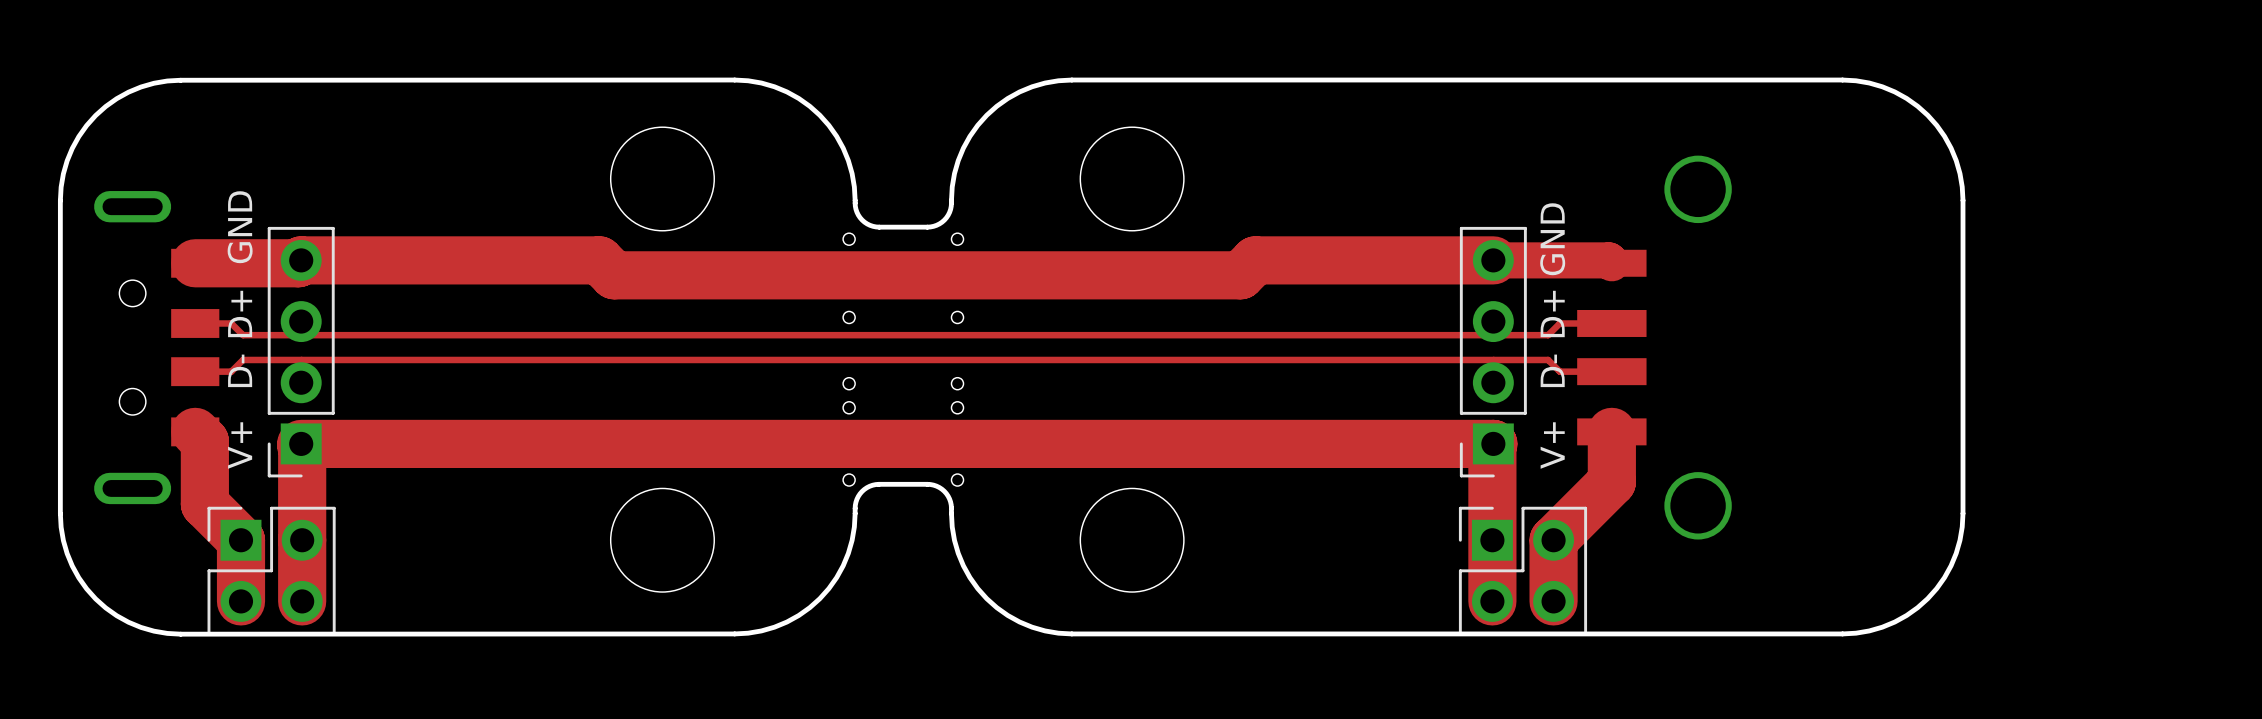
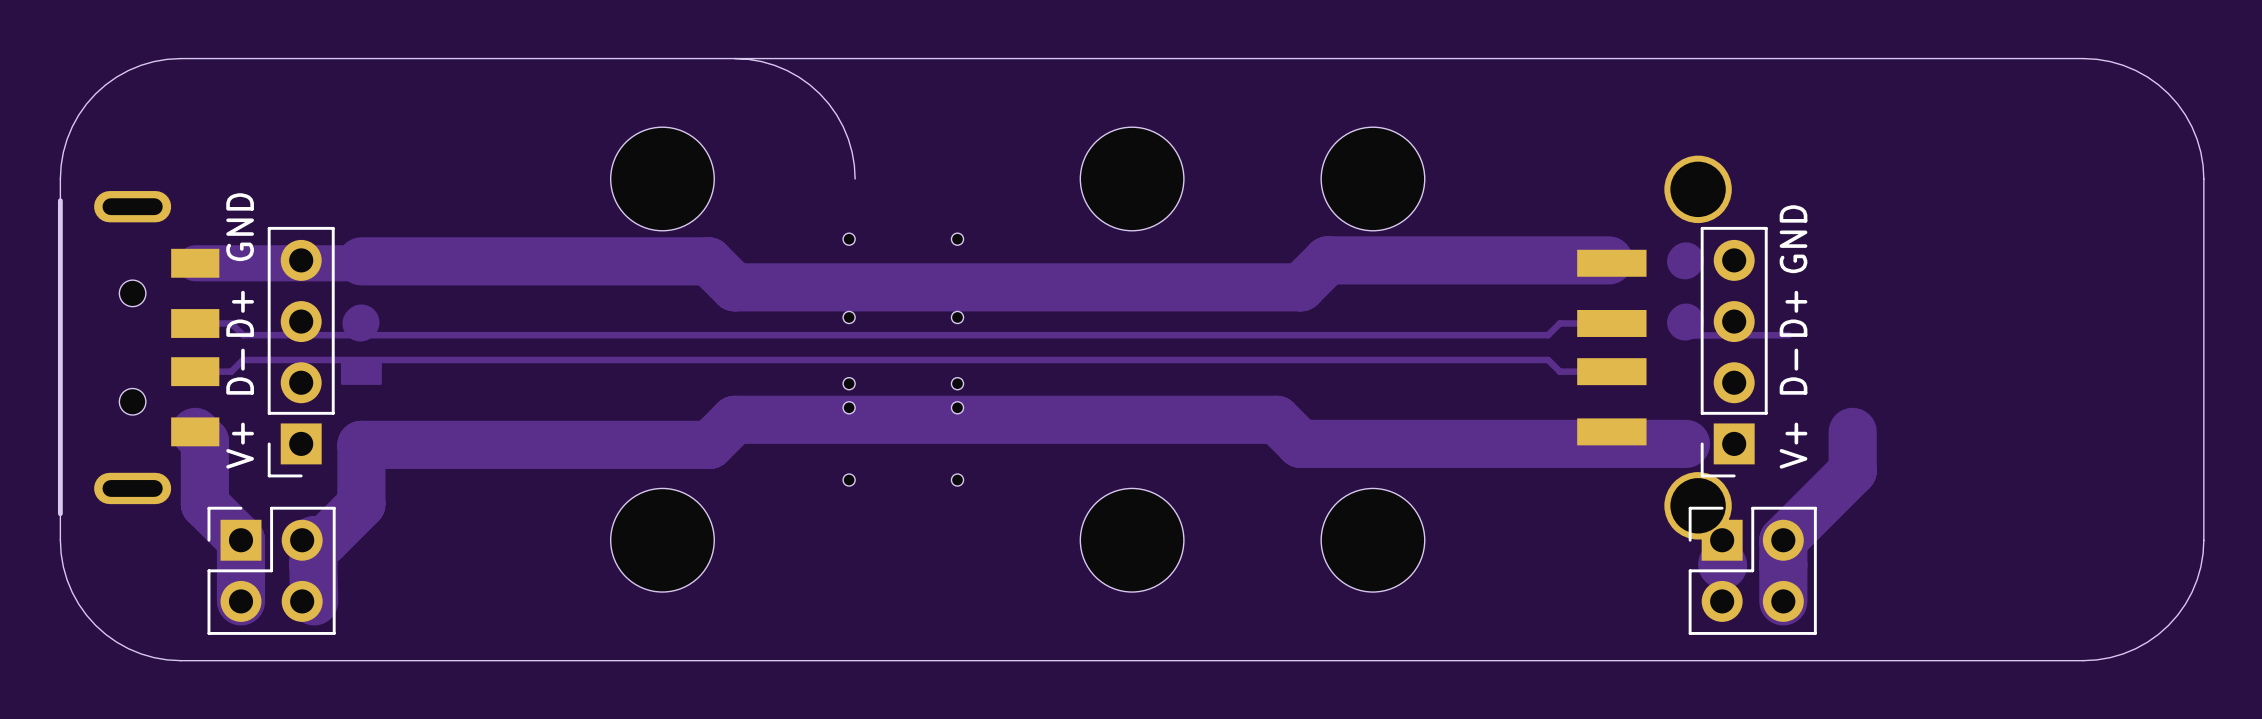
board edge: none -> (734, 58) (748, 59) (774, 65) (798, 77) (819, 93) (836, 114) (848, 139) (854, 165) (855, 178)
part: none -> (1372, 178)
board edge: (60, 200) (61, 187) (67, 160) (78, 136) (86, 125) (95, 115) (116, 98) (141, 87) (153, 83) (180, 80) (734, 80) (761, 83) (786, 91) (809, 106) (819, 115) (836, 136) (848, 160) (858, 215) (864, 222) (876, 226) (930, 226) (942, 222) (950, 209) (954, 173) (963, 148) (969, 136) (986, 115) (1007, 98) (1032, 86) (1058, 80) (1071, 80) (1856, 80) (1882, 86) (1894, 91) (1906, 98) (1927, 115) (1944, 136) (1956, 160) (1962, 186) (1963, 200) (1963, 513) (1959, 540) (1951, 565) (1944, 577) (1927, 598) (1906, 615) (1894, 622) (1882, 627) (1856, 633) (1058, 633) (1032, 627) (1007, 615) (986, 598) (977, 588) (969, 577) (958, 553) (952, 527) (950, 501) (941, 489) (930, 484) (878, 484) (864, 489) (856, 499) (854, 527) (848, 553) (836, 577) (828, 588) (819, 598) (798, 615) (774, 627) (761, 630) (734, 633) (167, 633) (141, 627) (128, 622) (116, 615) (95, 598) (78, 577) (67, 553) (61, 527) (60, 513) -> (60, 200) (63, 152) (72, 126) (86, 103) (95, 93) (116, 77) (141, 65) (167, 59) (2096, 59) (2123, 65) (2135, 70) (2147, 77) (2168, 93) (2185, 114) (2191, 126) (2200, 152) (2203, 178) (2203, 540) (2203, 553) (2197, 580) (2185, 604) (2168, 625) (2147, 642) (2135, 648) (2123, 653) (2096, 659) (180, 660) (153, 657) (128, 648) (105, 634) (86, 615) (72, 592) (63, 567) (61, 553) (60, 513)
text position: GND (1552, 239) -> GND (1793, 239)
track: (1327, 260) (1255, 260) (1240, 275) (614, 275) (599, 260) (301, 260) (298, 263) -> (1327, 260) (1300, 287) (734, 287) (708, 261) (361, 261) (359, 263) (298, 263)
track width: thin (1493, 260) (1608, 260) -> thick (1493, 260) (1608, 260)
track: none -> (1686, 260) (1685, 261)
track width: thick (195, 263) (298, 263) -> thin (195, 263) (298, 263)
text position: D+ (1552, 313) -> D+ (1793, 313)
track: none -> (1685, 322) (1686, 335) (1788, 335)
track: none -> (360, 323) (361, 335)
part position: (1493, 352) -> (1734, 352)
drawing: none -> [340, 358, 382, 385]
text position: D- (1552, 370) -> D- (1793, 371)
track: (1611, 431) (1611, 481) (1553, 540) (1553, 601) -> none
track: none -> (1852, 431) (1852, 470) (1783, 540) (1783, 601)
track: (301, 443) (1300, 443) -> (314, 601) (314, 540) (325, 540) (361, 504) (361, 444) (709, 444) (734, 419) (1276, 419) (1300, 443)
track: (1493, 443) (1492, 601) -> (1493, 443) (1685, 444)
track: (301, 445) (302, 601) -> none
text position: V+ (1552, 445) -> V+ (1793, 445)
part: none -> (1372, 540)
track: none -> (1722, 564) (1723, 565)
part position: (1522, 570) -> (1752, 570)

